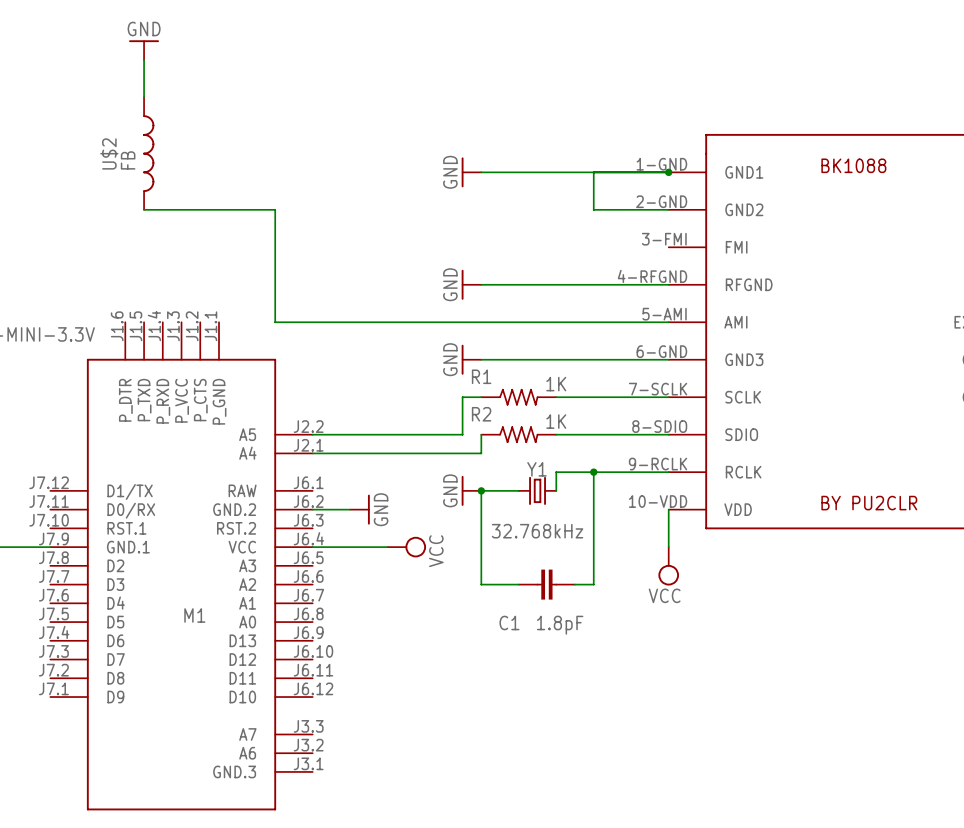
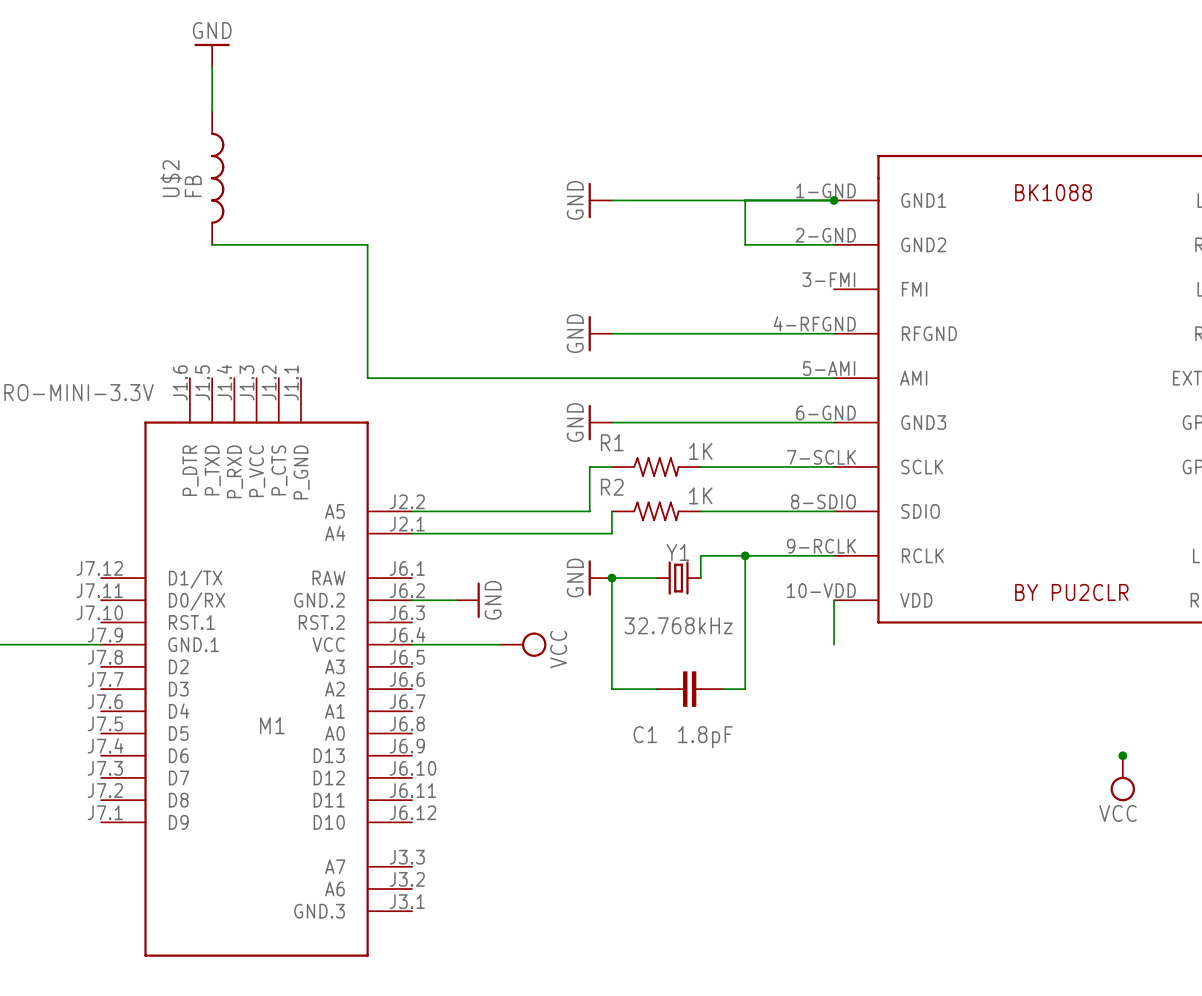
power symbol: VCC (668, 566) -> none
junction: none -> (1122, 755)
power symbol: none -> VCC (1122, 778)

